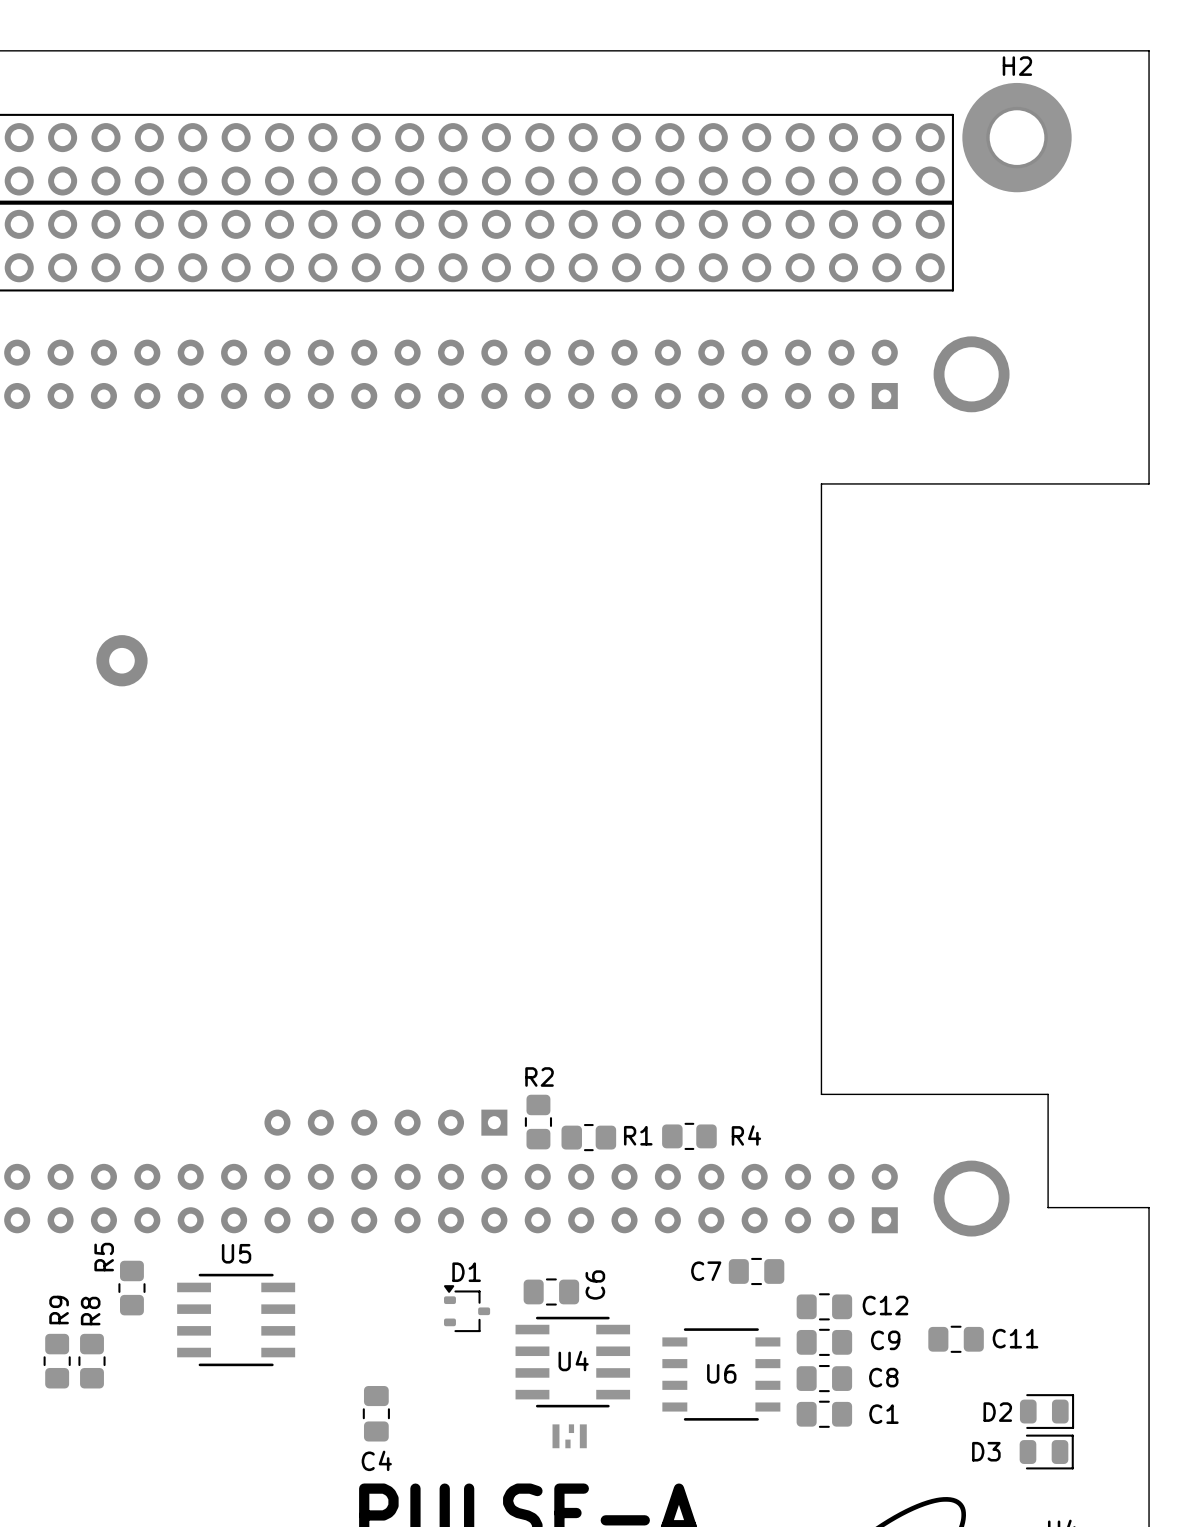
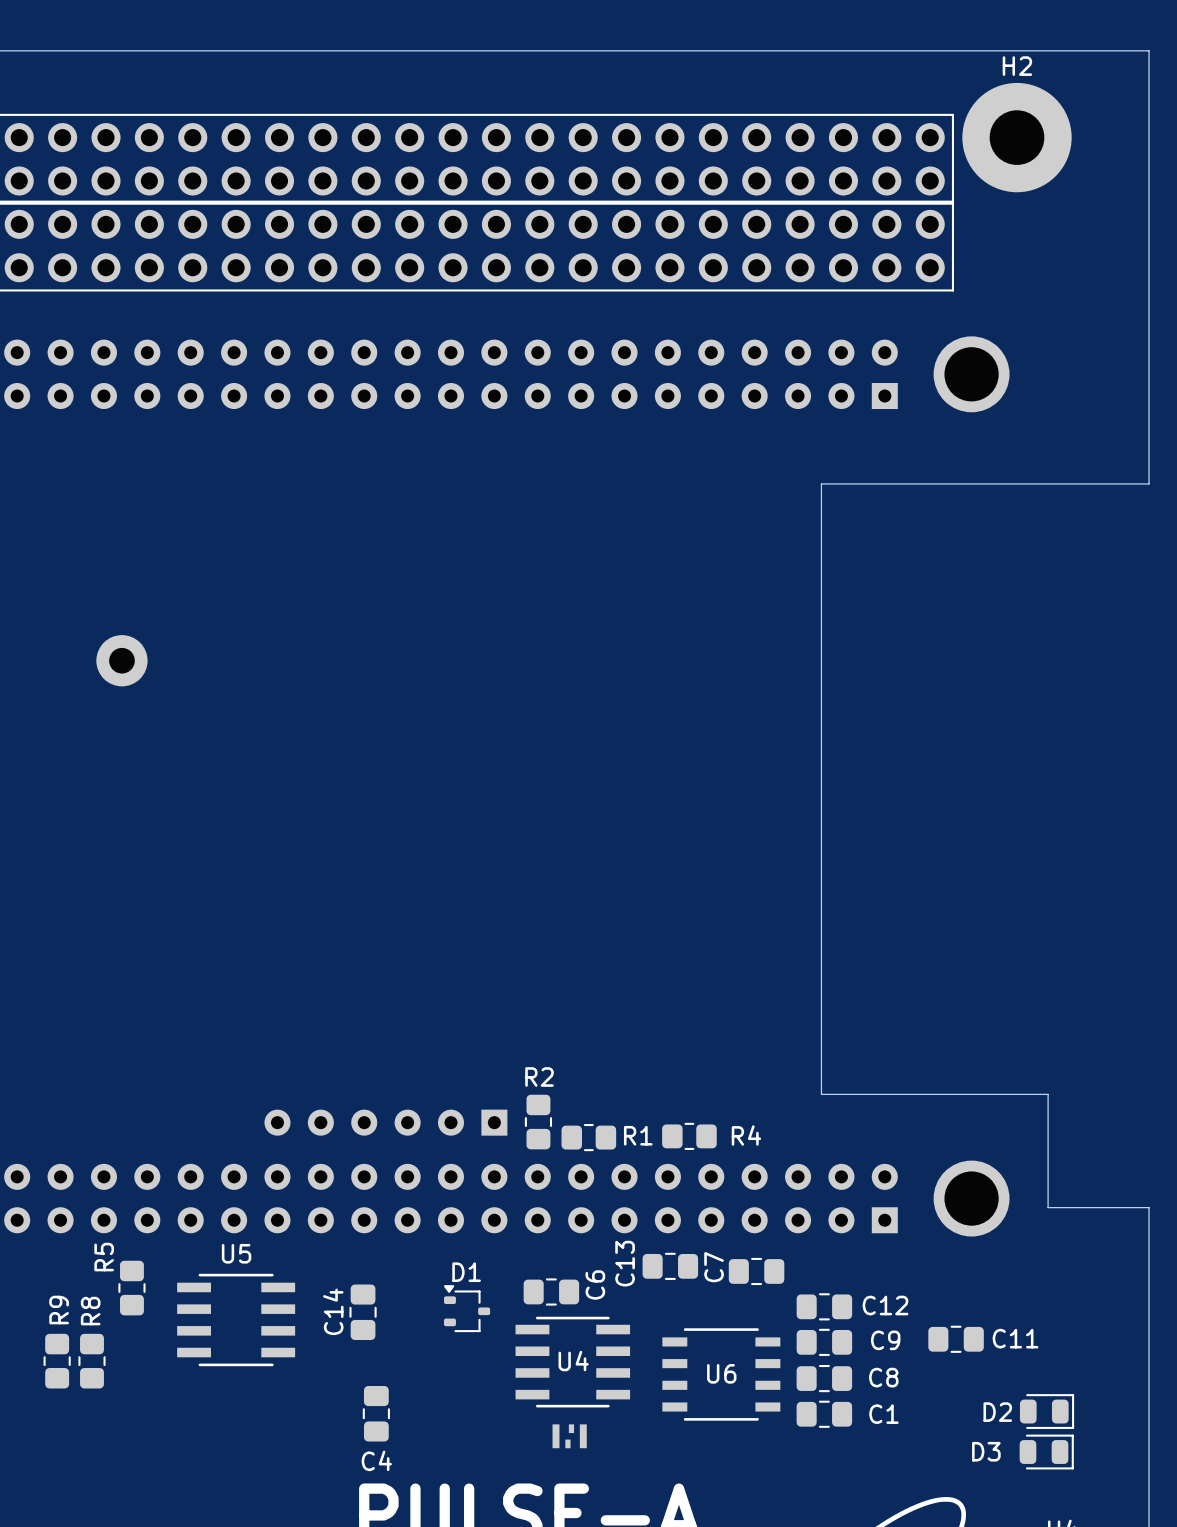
C13: none -> (670, 1266)
C7 name rotation: 0° (706, 1271) -> 90° counterclockwise (714, 1267)
C14: none -> (363, 1312)

